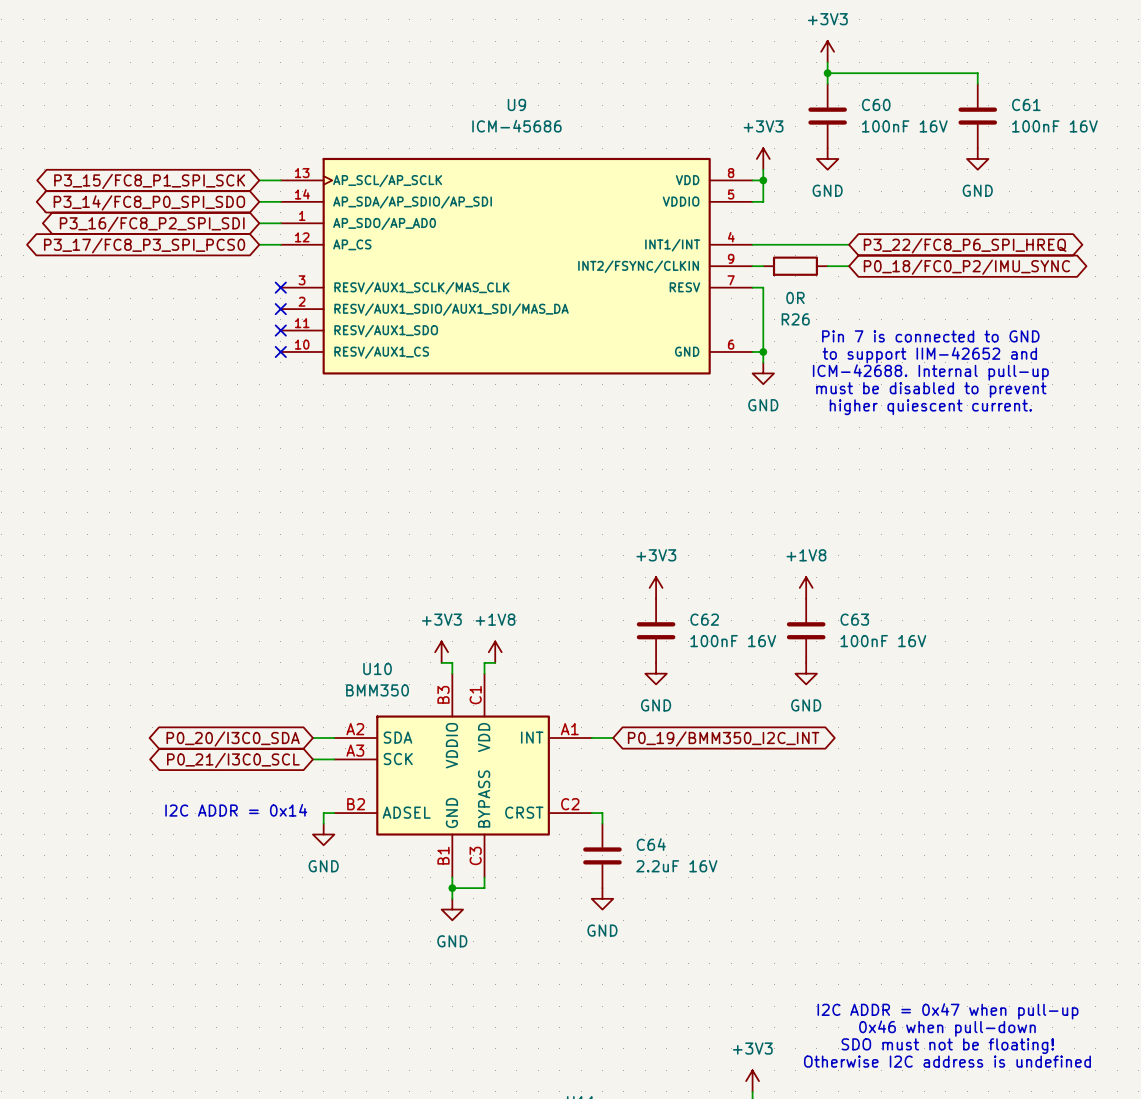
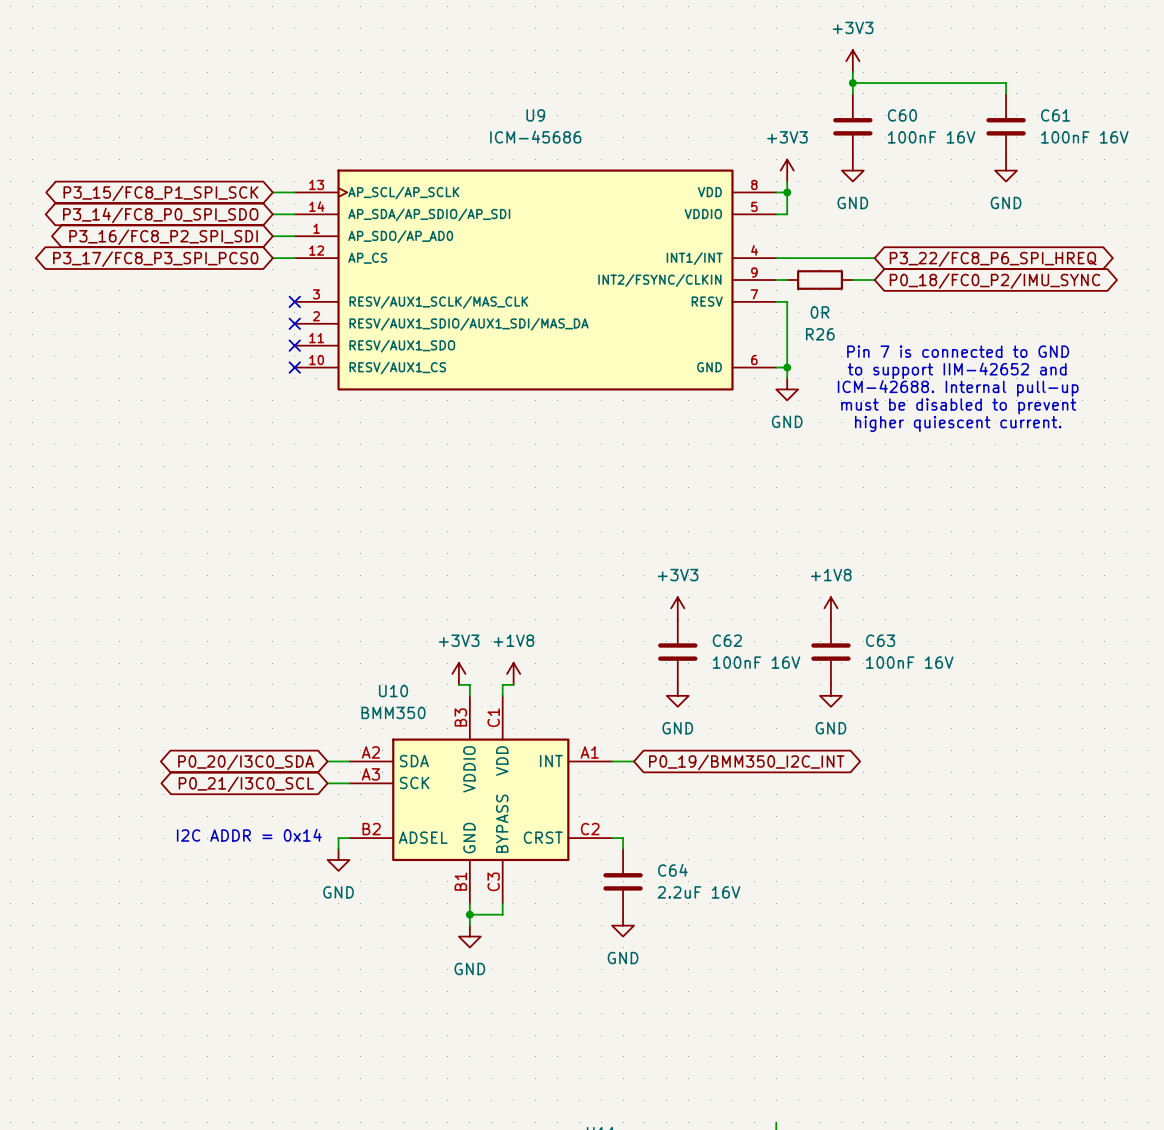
text: I2C ADDR = 0x47 when pull-up (947, 1011) -> none
text: 0x46 when pull-down (947, 1028) -> none
text: SDO must not be floating! (947, 1046) -> none
text: Otherwise I2C address is undefined (947, 1061) -> none
power symbol: +3V3 (752, 1081) -> none

